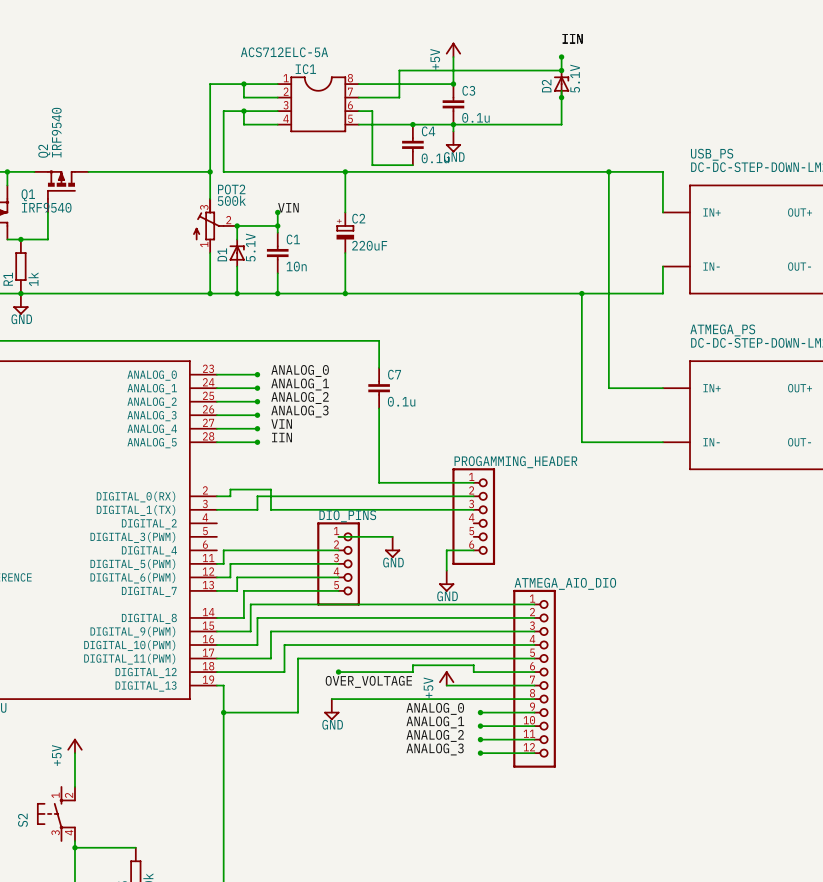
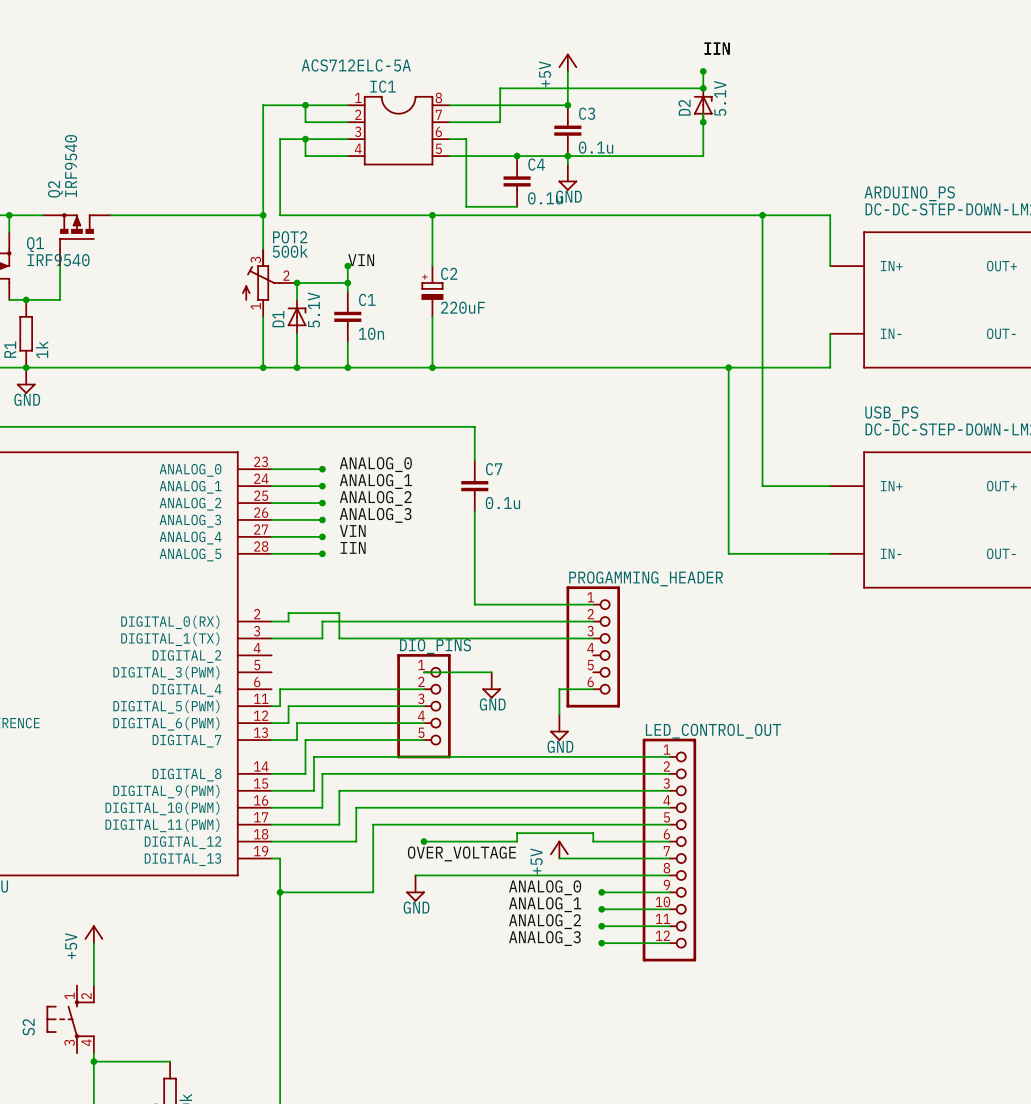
USB_PS name: USB_PS (712, 154) -> ARDUINO_PS (909, 193)
ATMEGA_PS name: ATMEGA_PS (722, 330) -> USB_PS (891, 413)
ATMEGA_AIO_DIO name: ATMEGA_AIO_DIO (565, 583) -> LED_CONTROL_OUT (713, 731)

